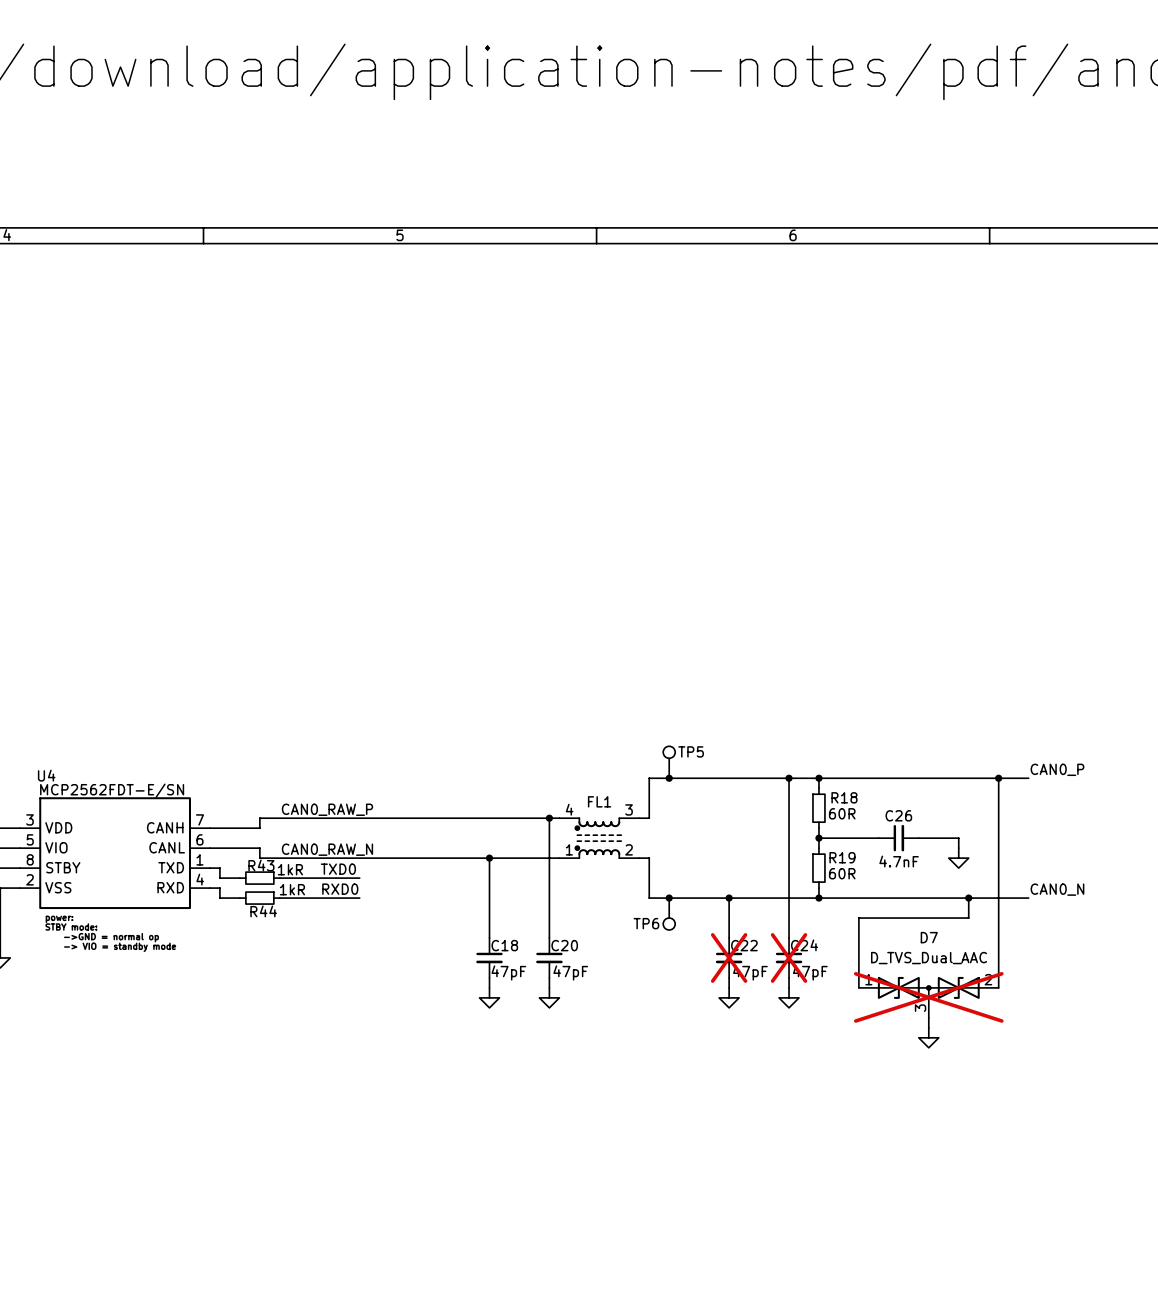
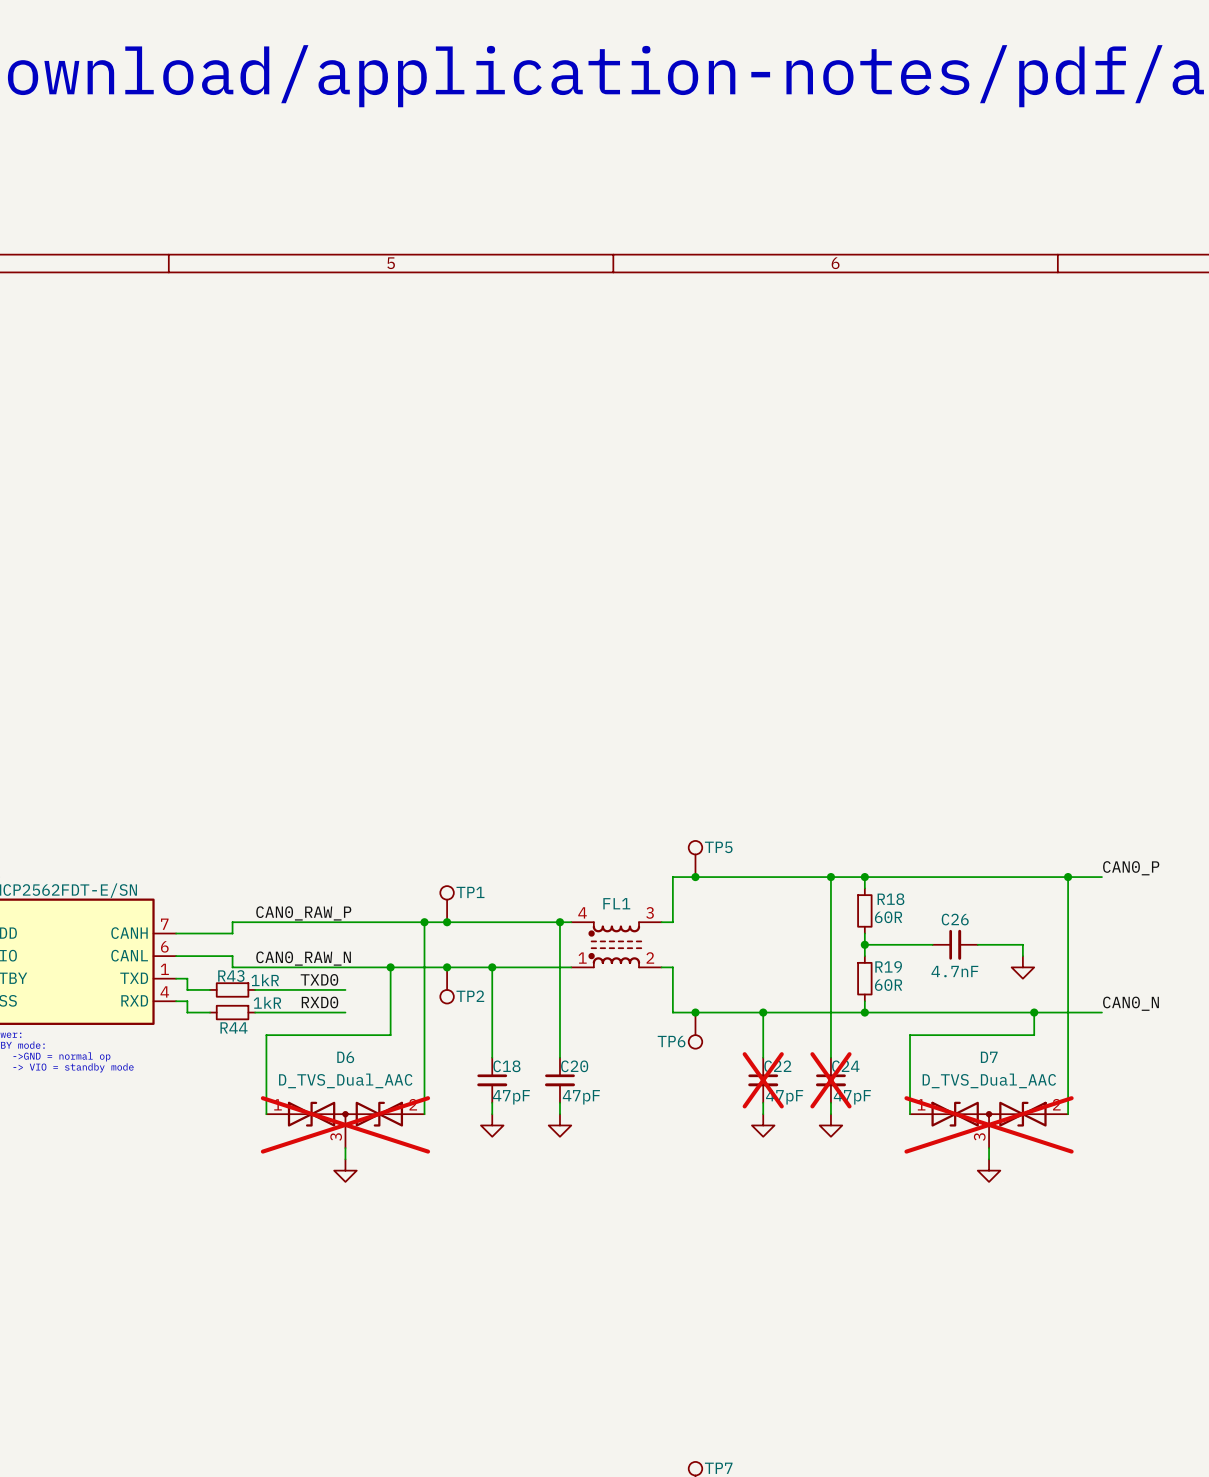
TP1: none -> (447, 904)
wire: none -> (424, 922) (424, 1114)
junction: none -> (424, 922)
junction: none -> (447, 922)
wire: none -> (390, 967) (390, 1035) (266, 1035) (266, 1114)
junction: none -> (390, 967)
junction: none -> (447, 967)
TP2: none -> (447, 985)
D6: none -> D_TVS_Dual_AAC (345, 1124)
wire: none -> (345, 1148) (345, 1159)
power symbol: none -> (345, 1170)

